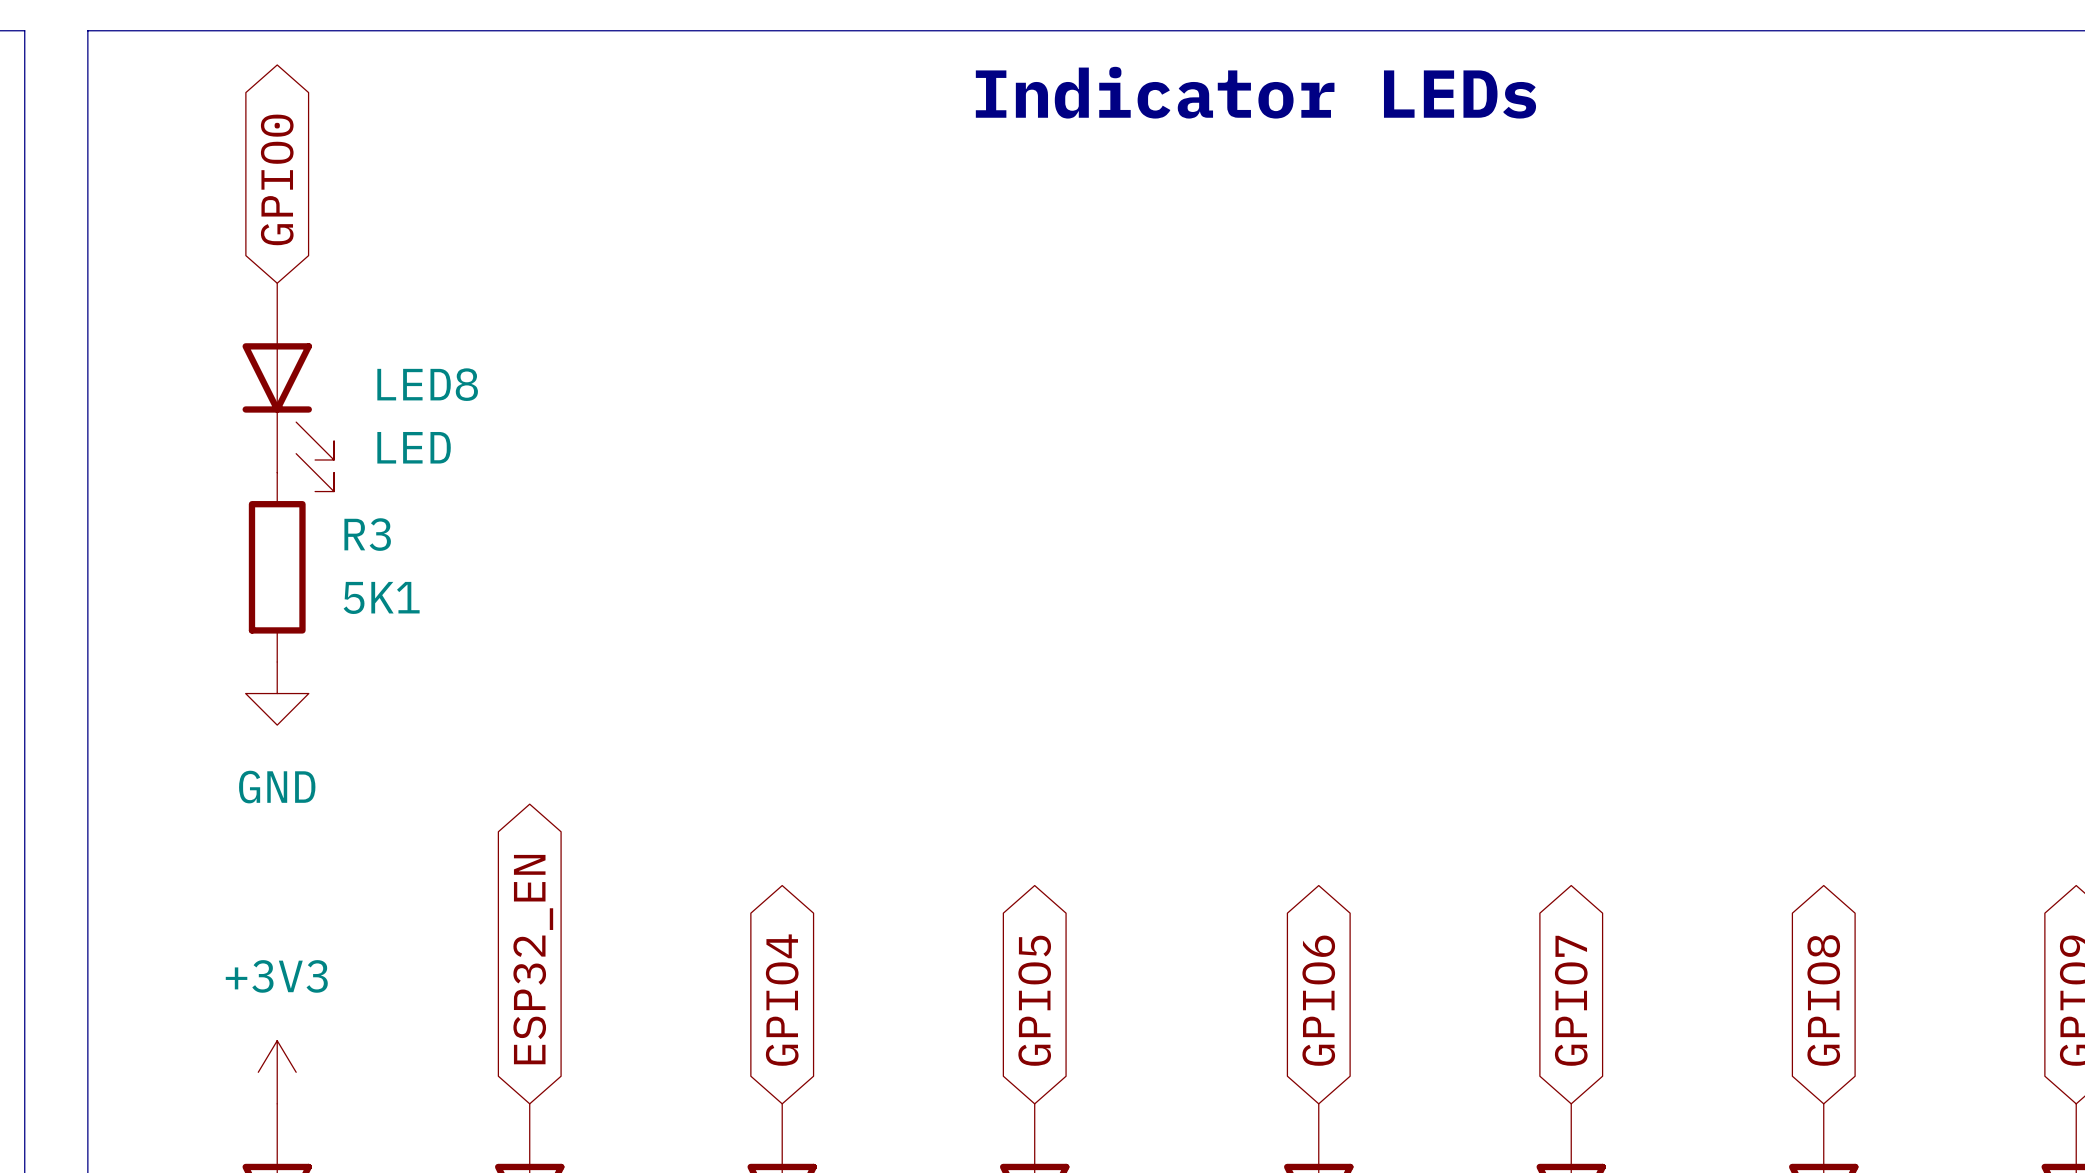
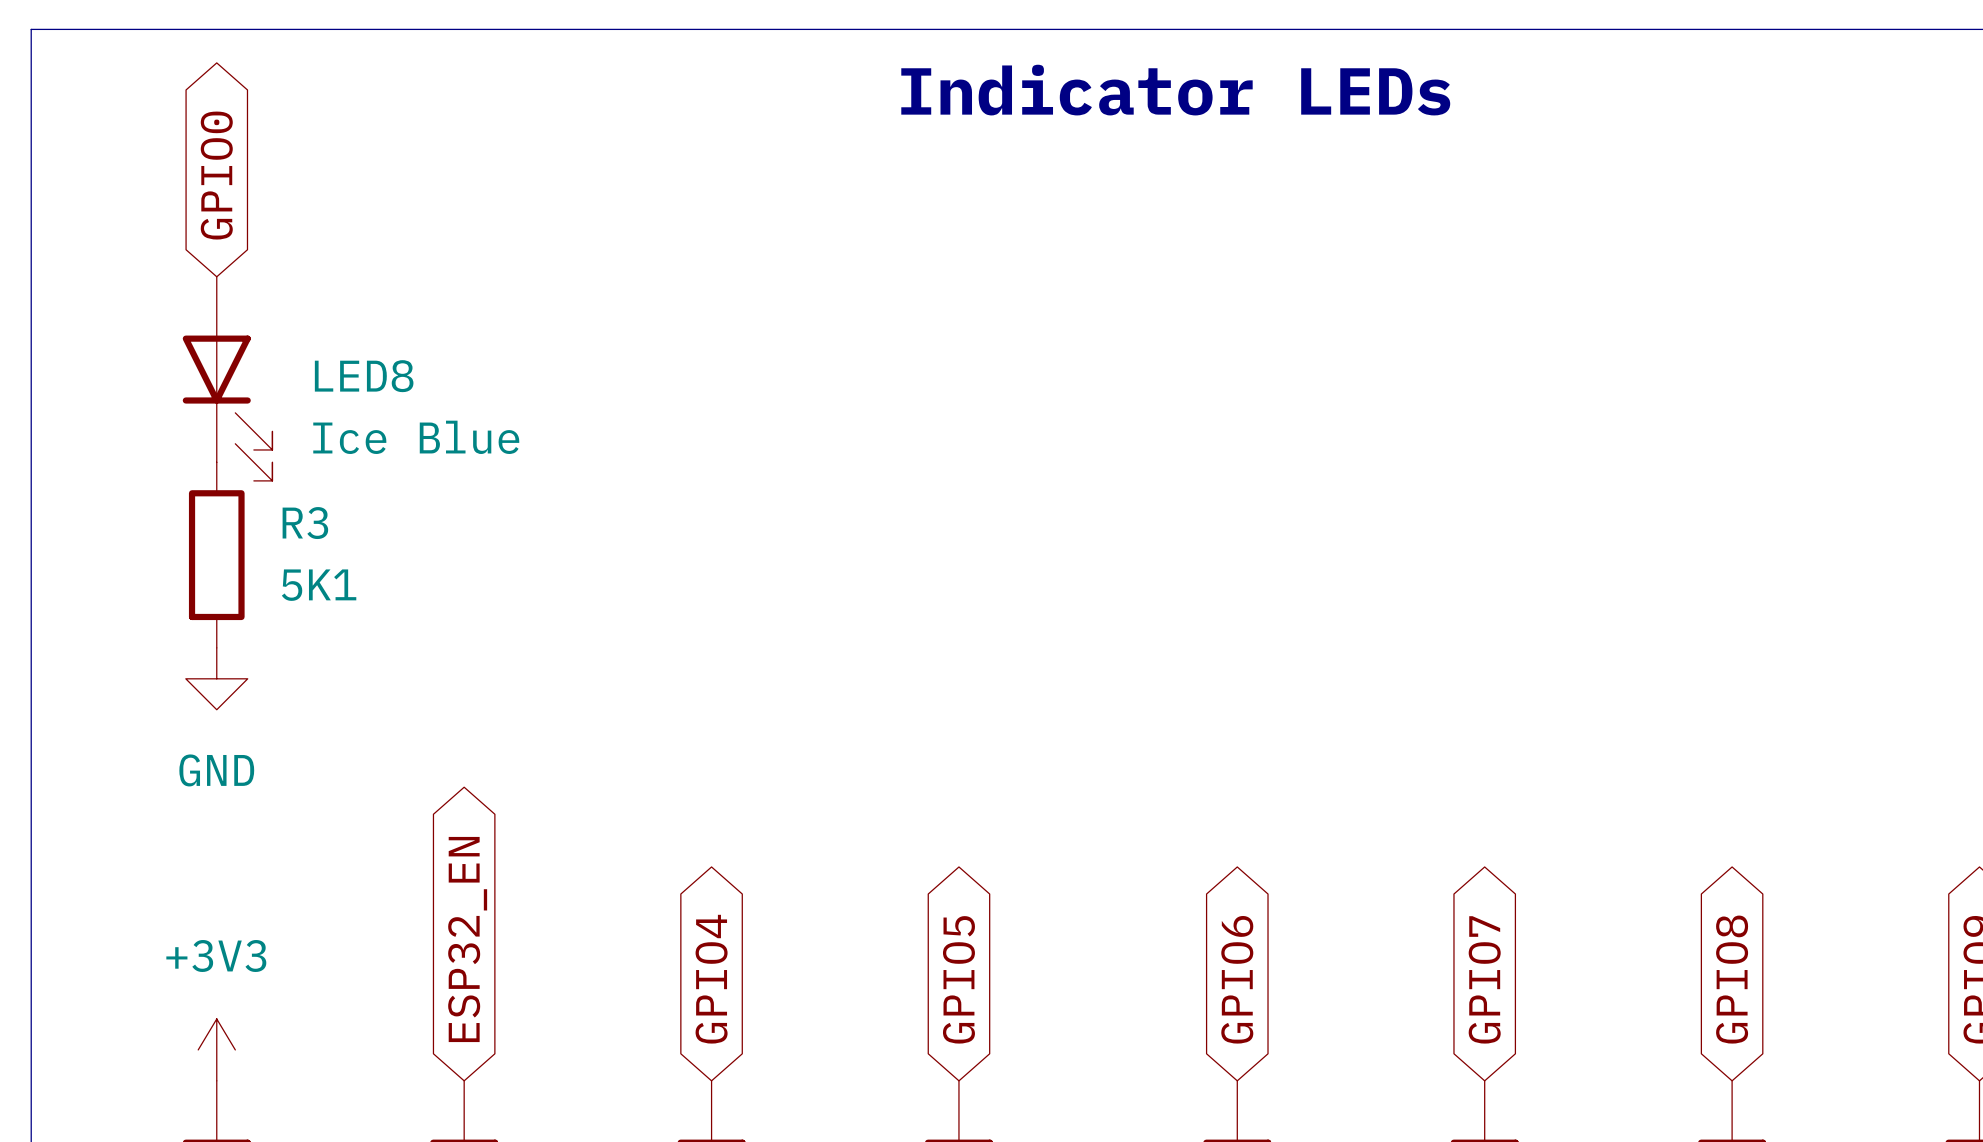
LED8 value: LED (414, 447) -> Ice Blue (416, 437)

